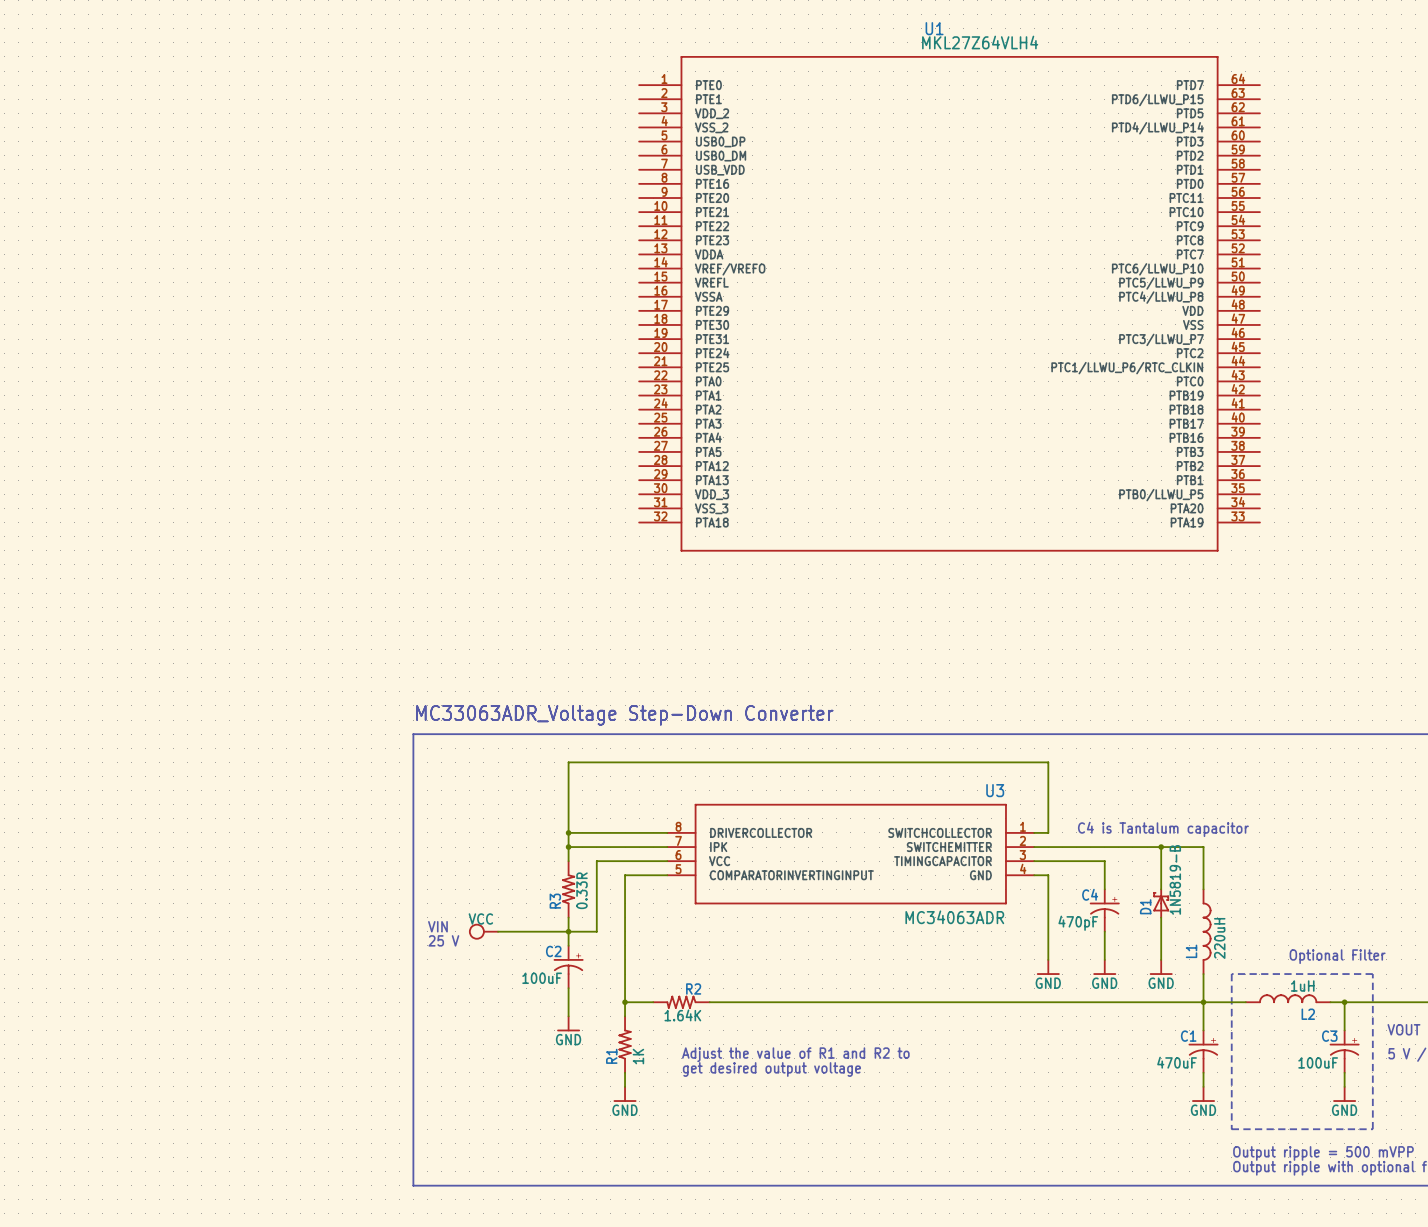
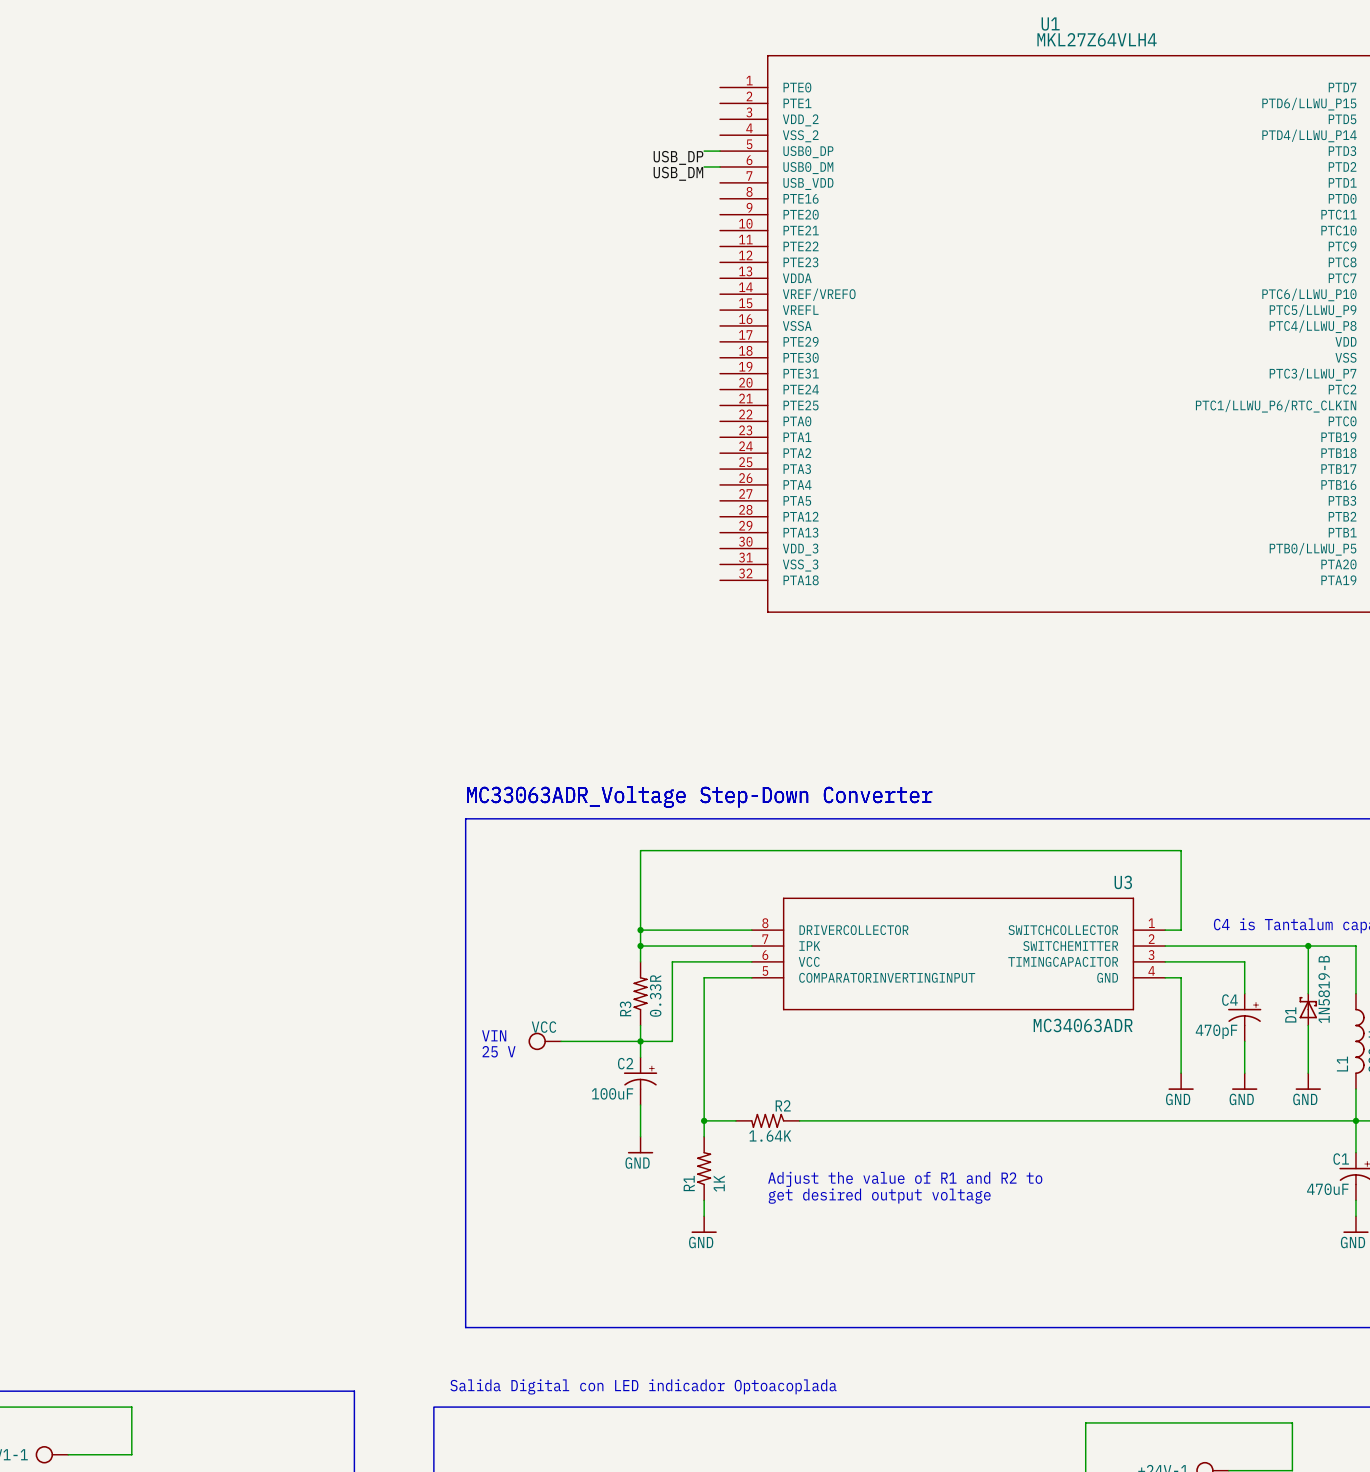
wire: none -> (704, 151) (720, 151)
label: none -> USB_DP (678, 157)
wire: none -> (704, 166) (720, 166)
label: none -> USB_DM (678, 173)

